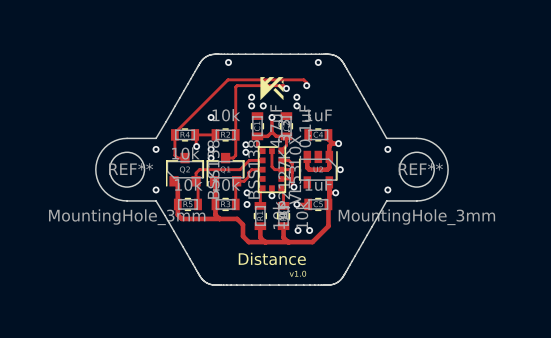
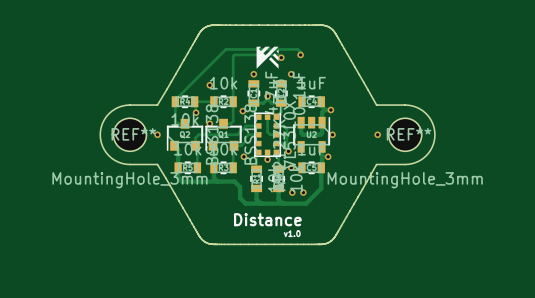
via: (228, 62) -> none
via: (318, 62) -> none
via: (251, 97) -> none
via: (296, 97) -> none
via: (251, 105) -> none
via: none -> (253, 74)
via: (263, 105) -> none
track: (271, 117) (271, 132) -> none
via: (271, 117) -> none
via: none -> (267, 96)
via: (156, 149) -> none
via: (211, 149) -> none
via: (387, 149) -> none
via: (245, 152) -> none
via: none -> (157, 134)
via: none -> (377, 134)
via: (156, 189) -> none
via: (387, 189) -> none
via: (247, 204) -> none

